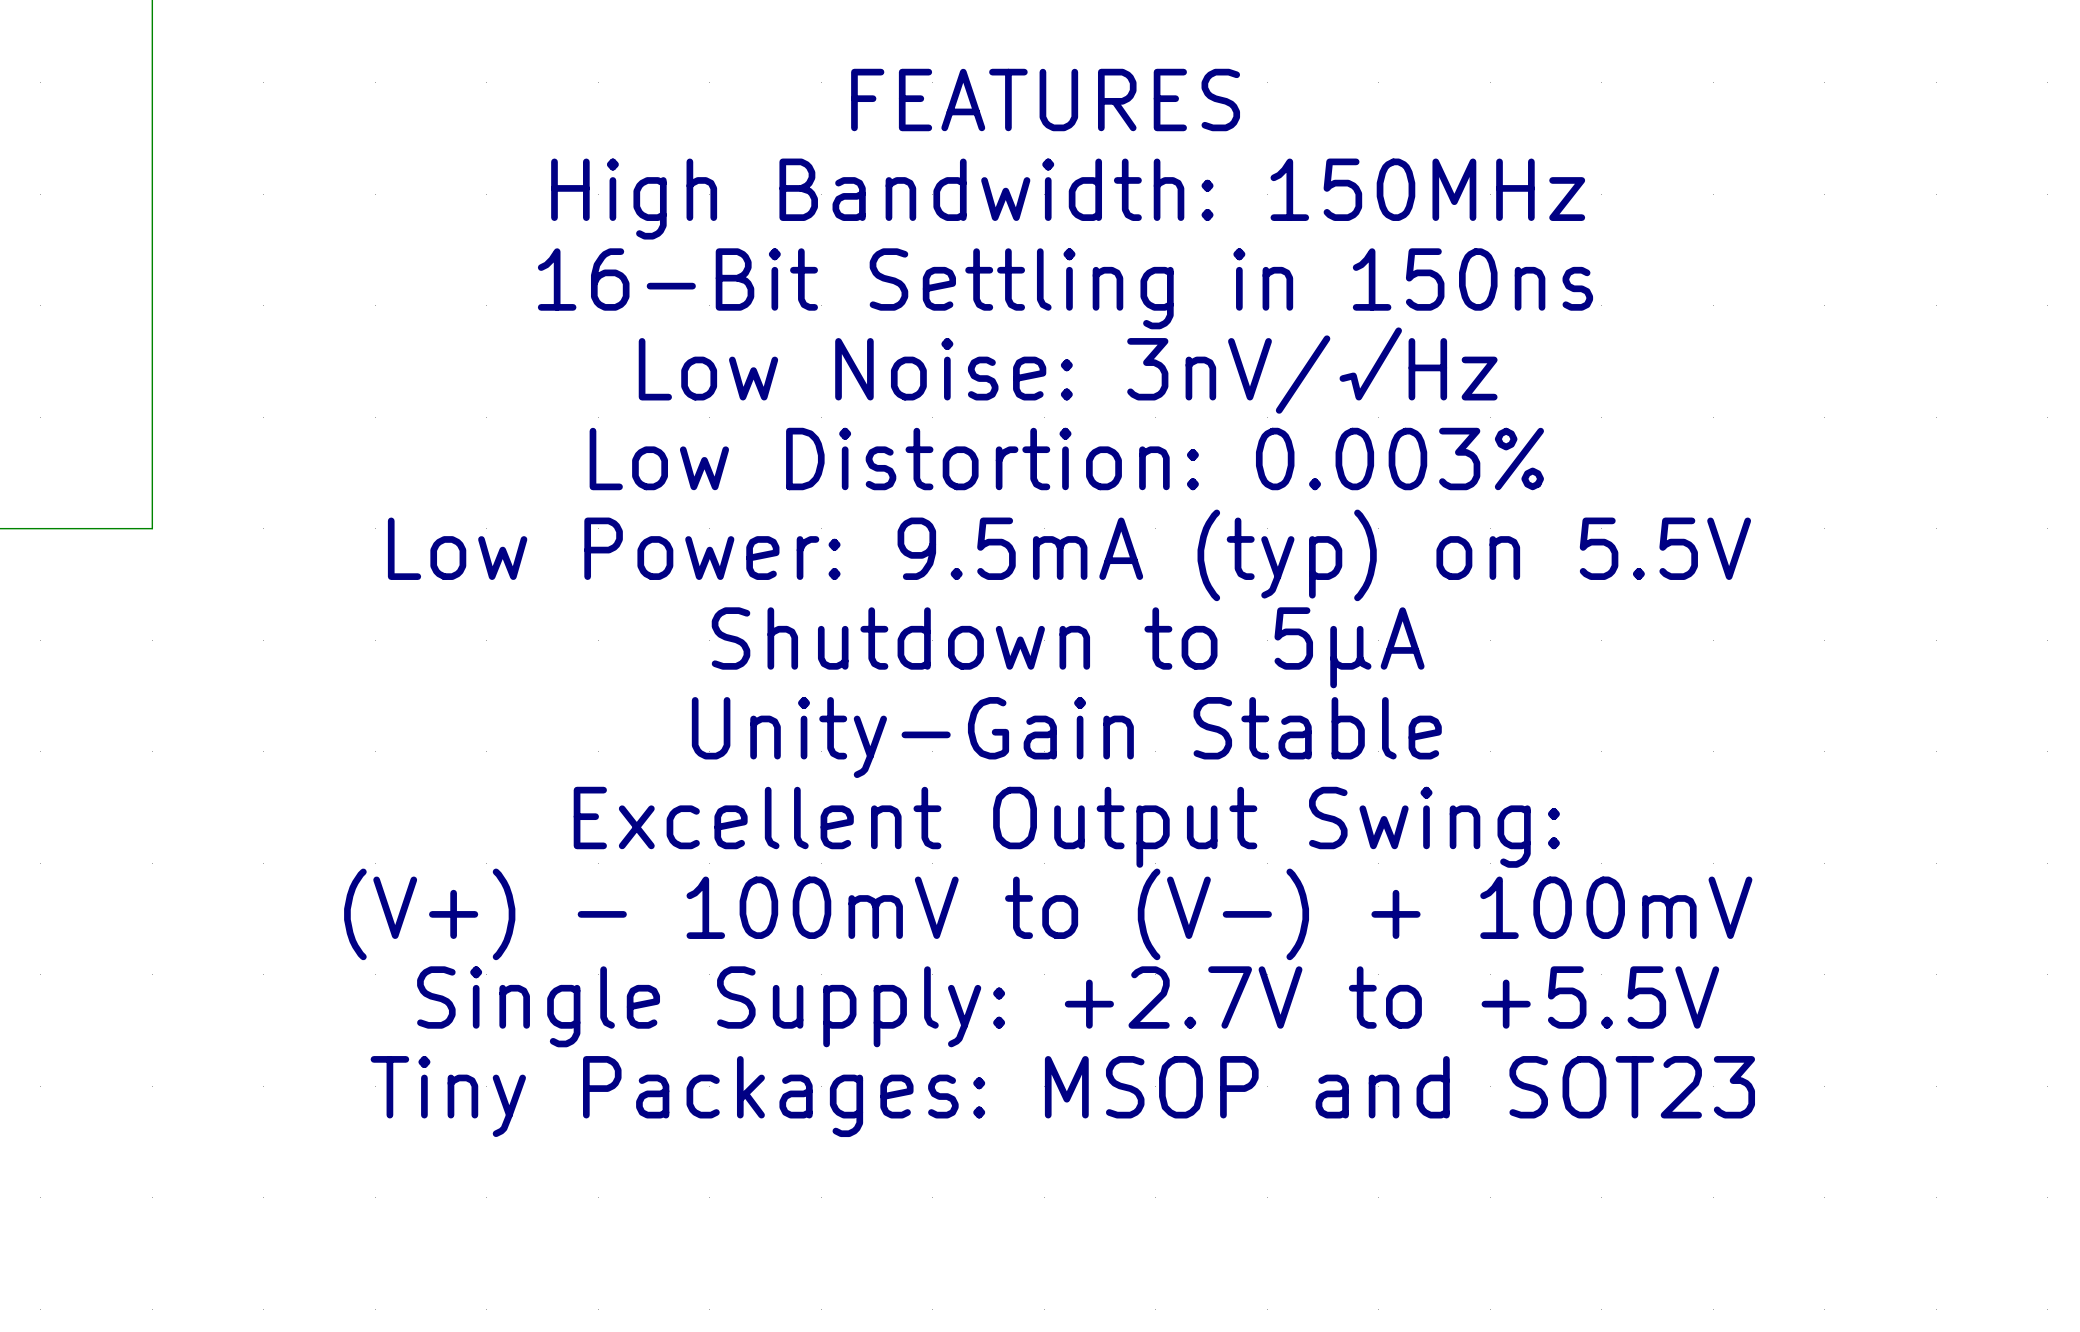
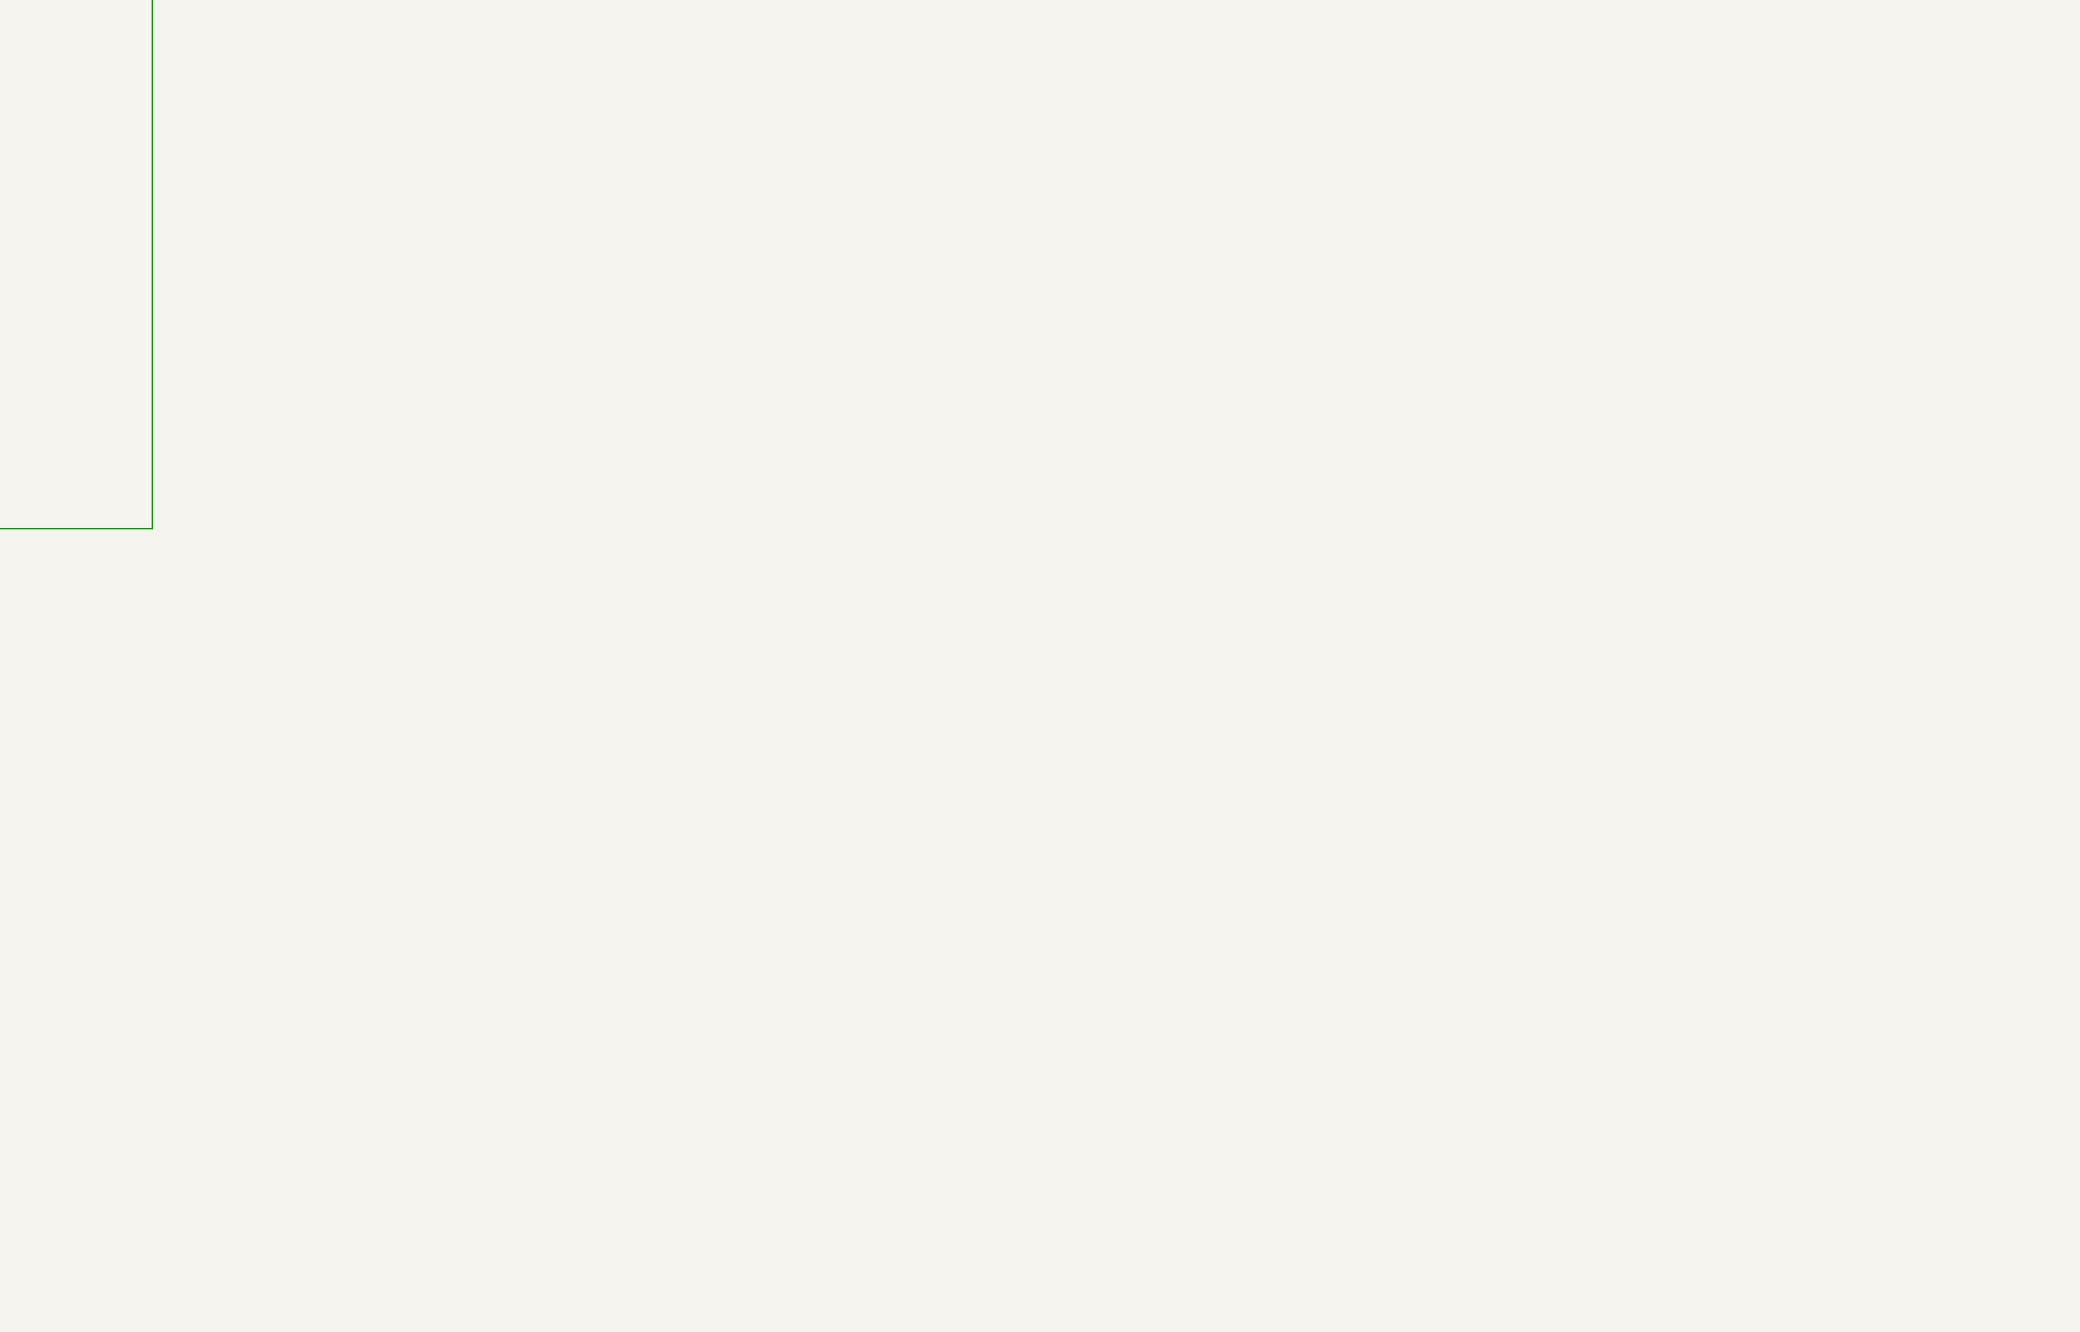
text: FEATURES (1045, 100) -> none
text: High Bandwidth: 150MHz (1068, 199) -> none
text: 16-Bit Settling in 150ns (1065, 288) -> none
text: Low Noise: 3nV/√Hz (1068, 370) -> none
text: Low Distortion: 0.003% (1066, 459) -> none
text: Low Power: 9.5mA (typ) on 5.5V (1069, 555) -> none
text: Shutdown to 5μA (1068, 647) -> none
text: Unity-Gain Stable (1066, 737) -> none
text: Excellent Output Swing: (1066, 827) -> none
text: (V+) − 100mV to (V−) + 100mV (1048, 914) -> none
text: Single Supply: +2.7V to +5.5V (1068, 1006) -> none
text: Tiny Packages: MSOP and SOT23 (1062, 1096) -> none

